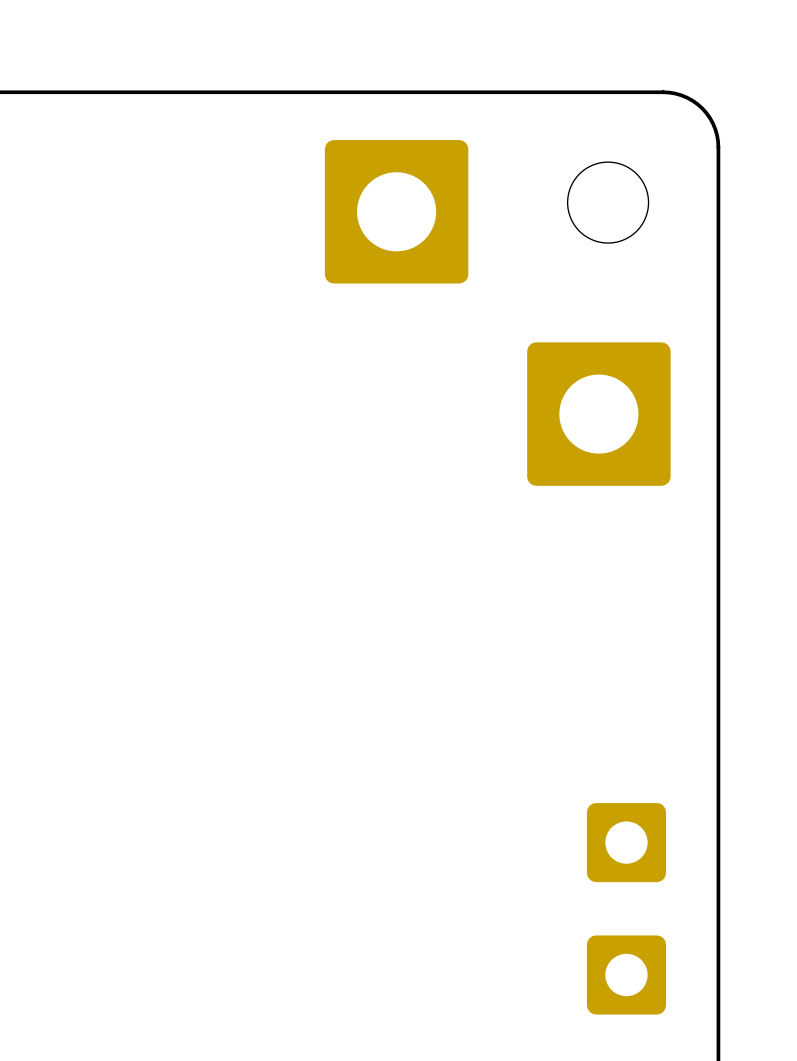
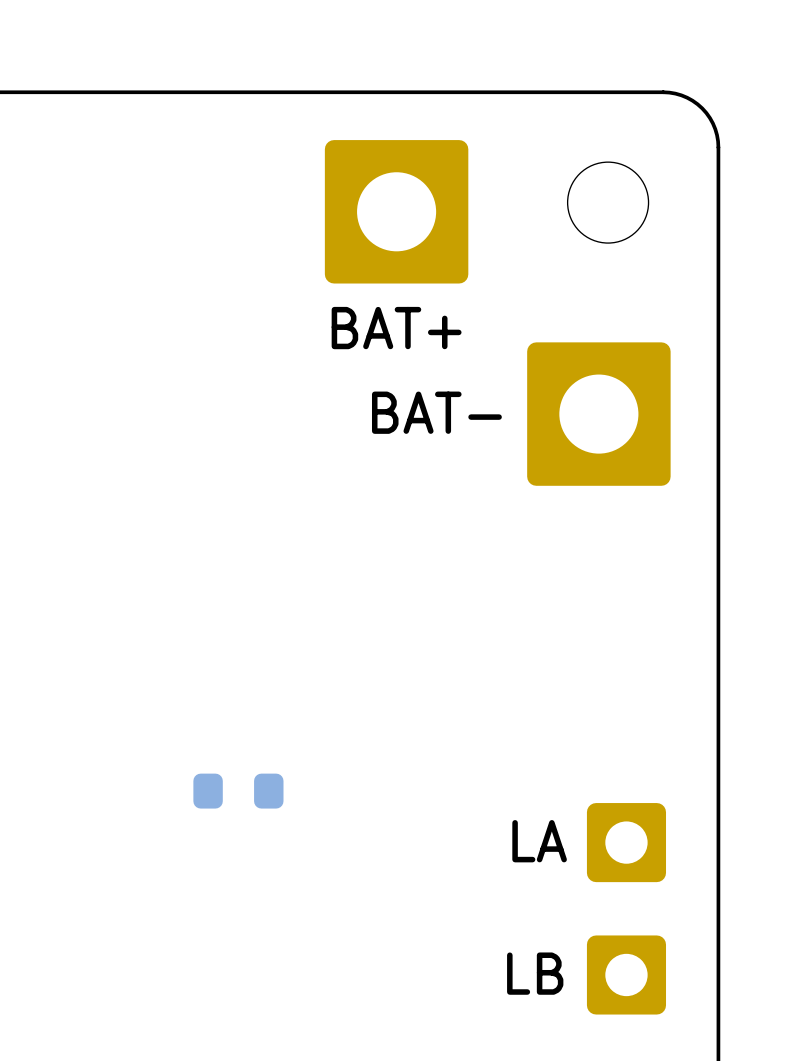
text: none -> BAT+ (396, 328)
text: none -> BAT- (436, 412)
part: none -> (238, 791)
text: none -> LA (539, 841)
text: none -> LB (535, 973)

